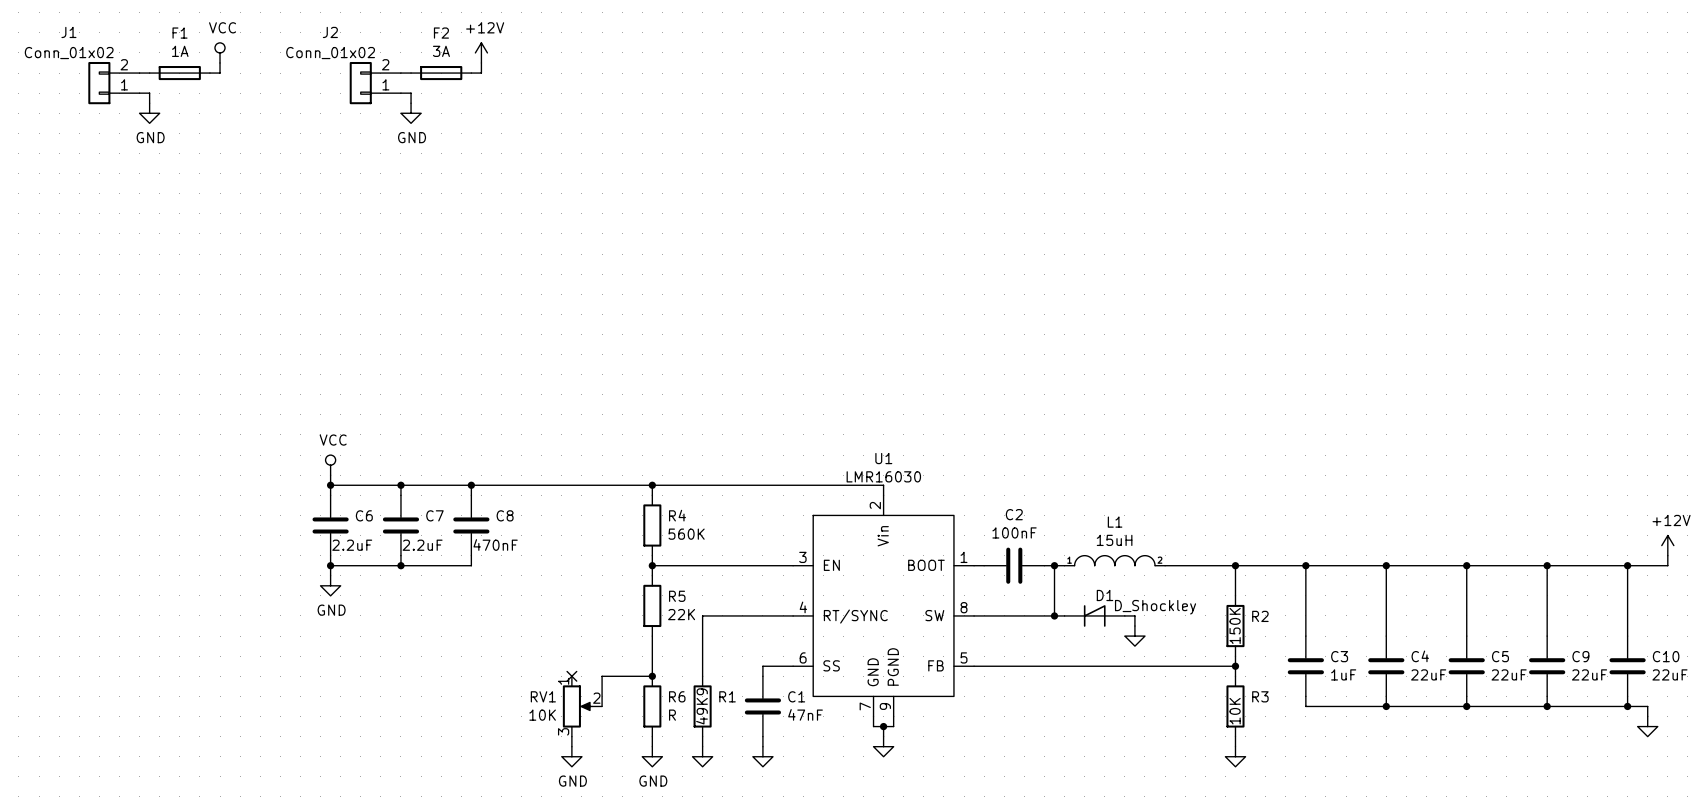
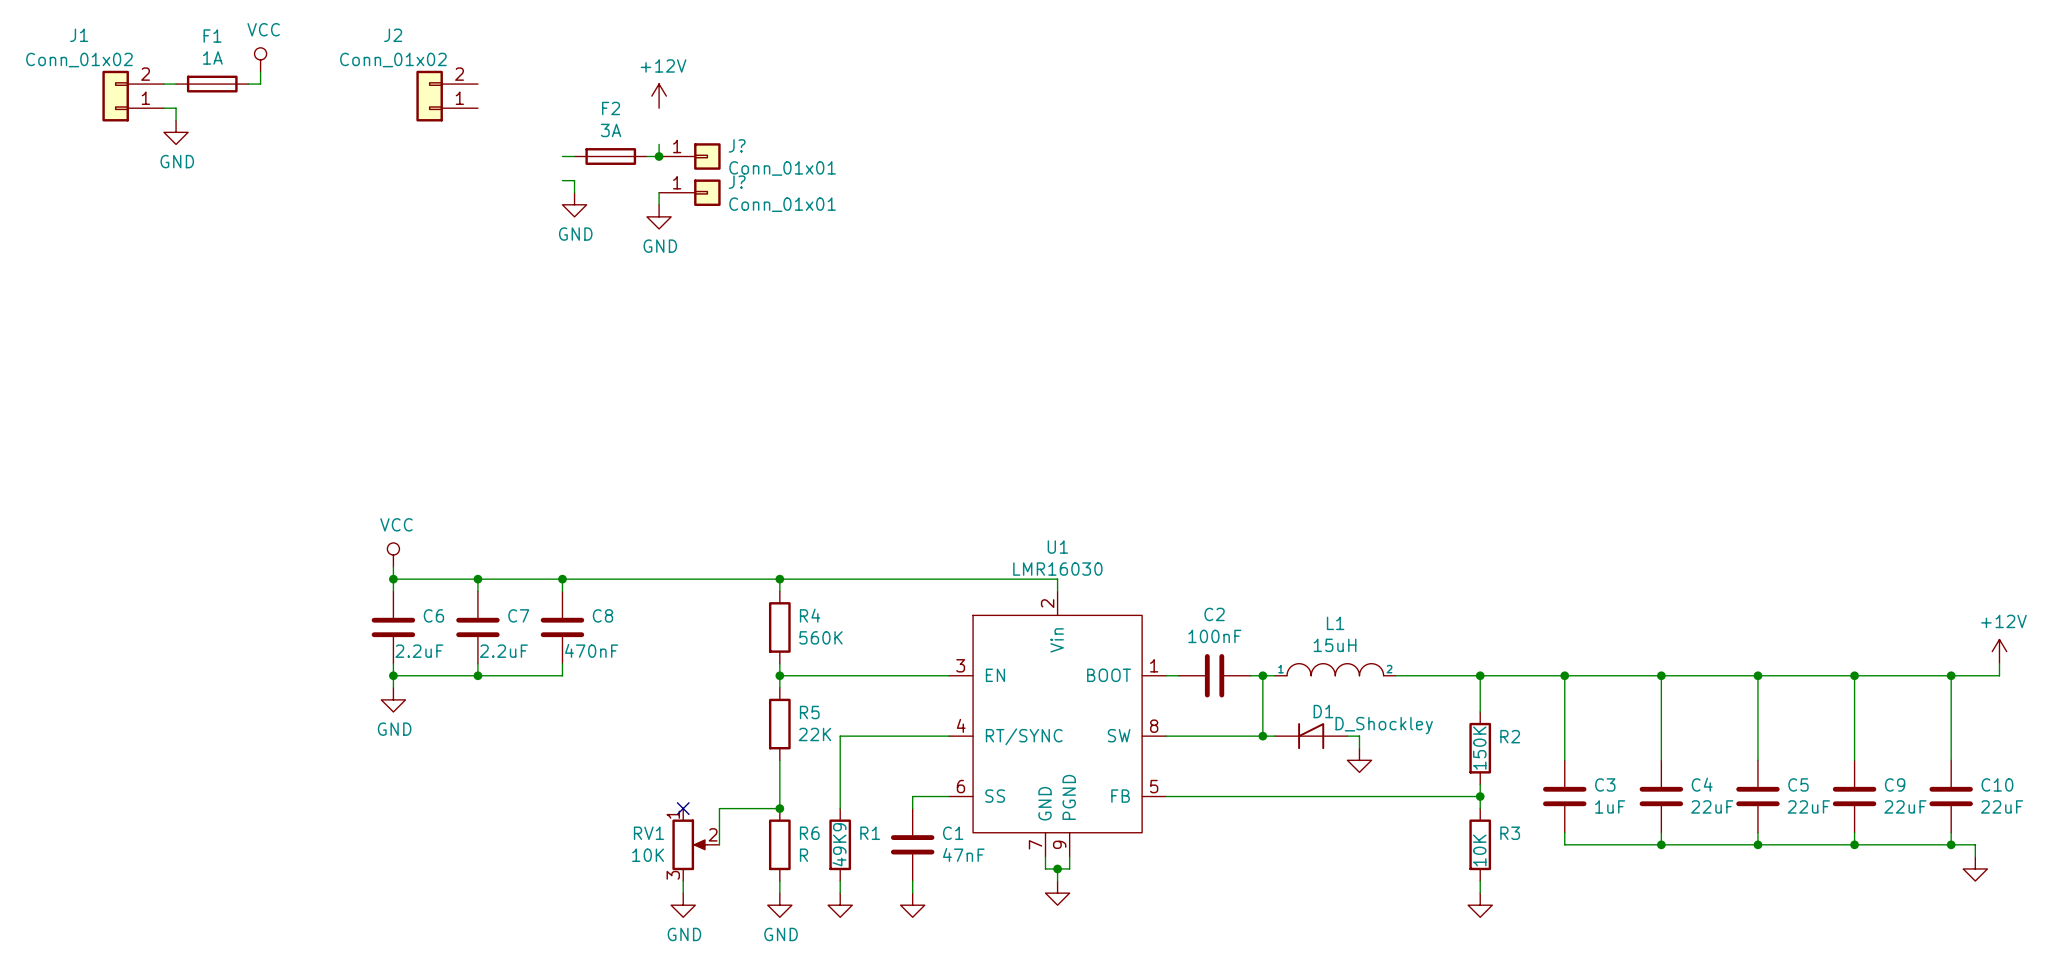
power symbol position: +12V (481, 52) -> +12V (659, 96)
wire: (481, 62) (481, 73) (471, 73) -> (659, 144) (659, 156) (647, 156)
wire: (400, 73) (411, 73) -> (562, 156) (574, 156)
F2 position: (441, 73) -> (610, 156)
wire: (400, 93) (411, 93) (411, 103) -> (562, 180) (574, 180) (574, 192)
power symbol: GND (411, 113) -> none
junction: none -> (659, 156)
J?: none -> Conn_01x01 (689, 156)
wire: none -> (659, 192) (659, 204)
J?: none -> Conn_01x01 (689, 192)
power symbol: none -> GND (574, 204)
power symbol: none -> GND (659, 216)

